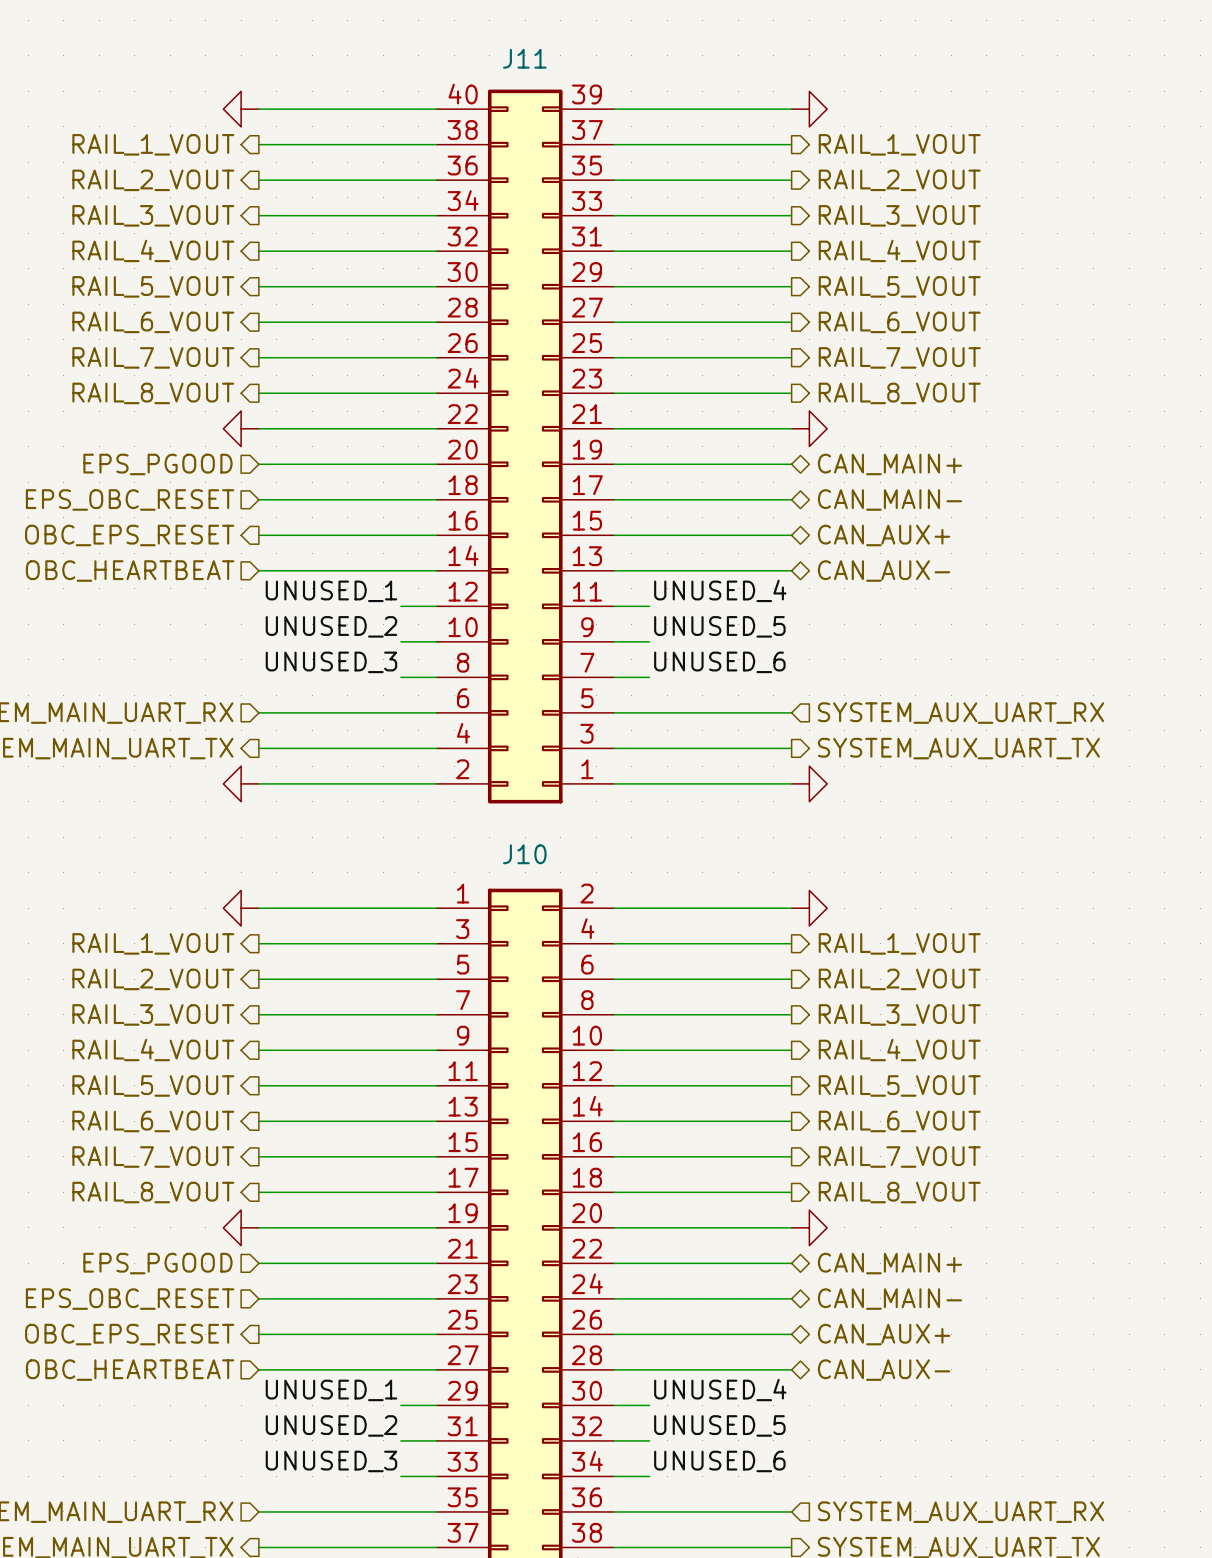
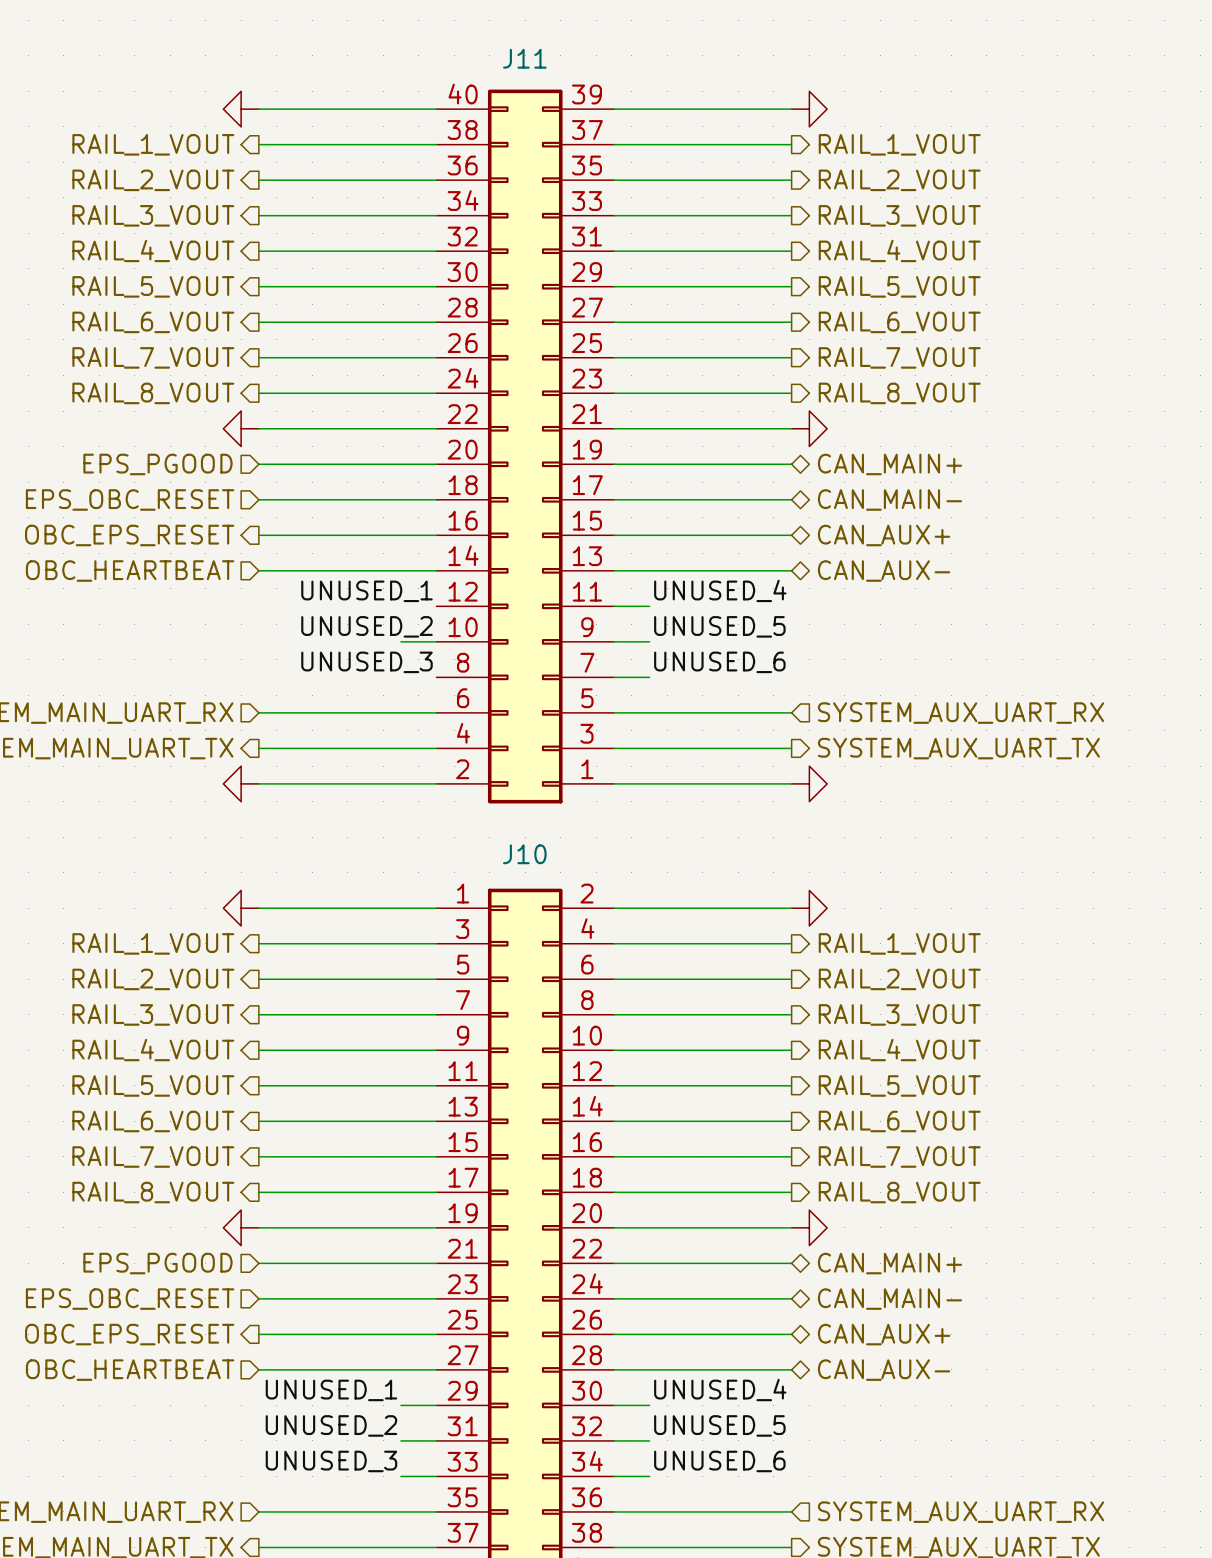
label position: UNUSED_1 (331, 591) -> UNUSED_1 (366, 591)
wire: (400, 606) (436, 606) -> none
label position: UNUSED_2 (331, 626) -> UNUSED_2 (366, 626)
label position: UNUSED_3 (331, 662) -> UNUSED_3 (366, 662)
wire: (400, 677) (436, 677) -> none

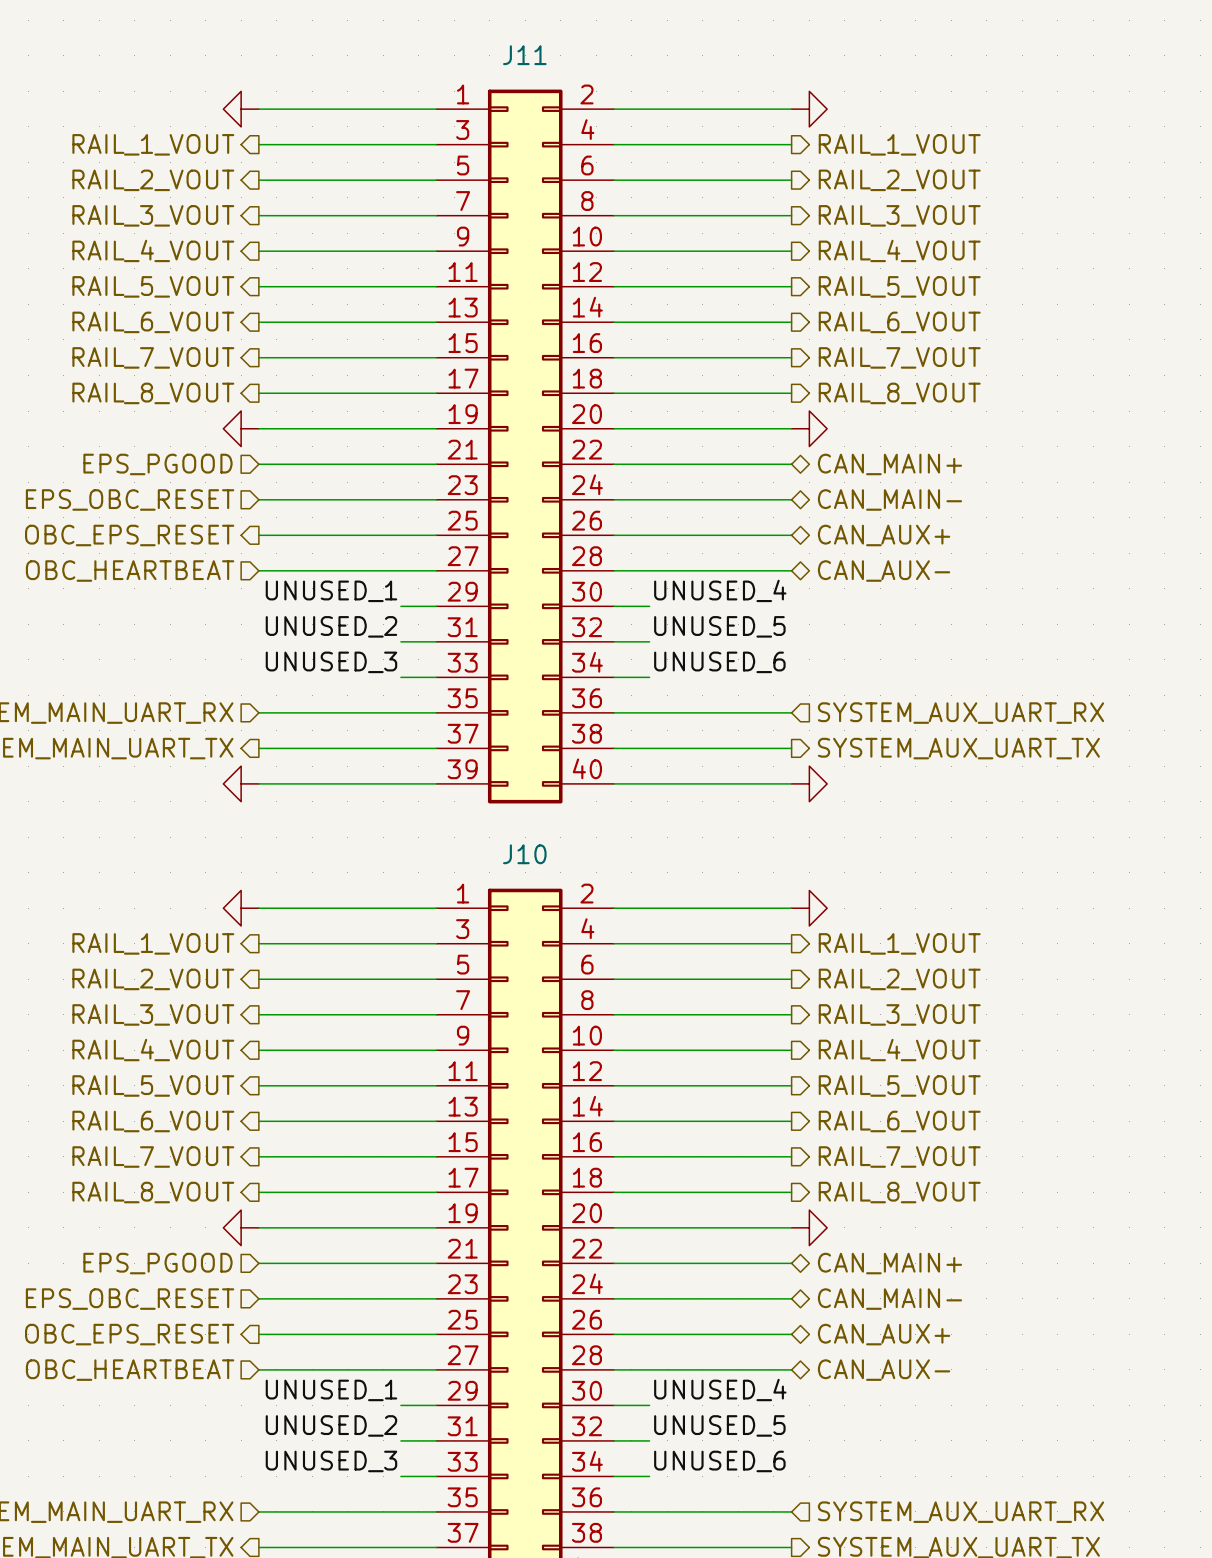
J11 rotation: 0° (525, 446) -> 180° (525, 446)
label position: UNUSED_1 (366, 591) -> UNUSED_1 (331, 591)
wire: none -> (400, 606) (436, 606)
label position: UNUSED_2 (366, 626) -> UNUSED_2 (331, 626)
label position: UNUSED_3 (366, 662) -> UNUSED_3 (331, 662)
wire: none -> (400, 677) (436, 677)

